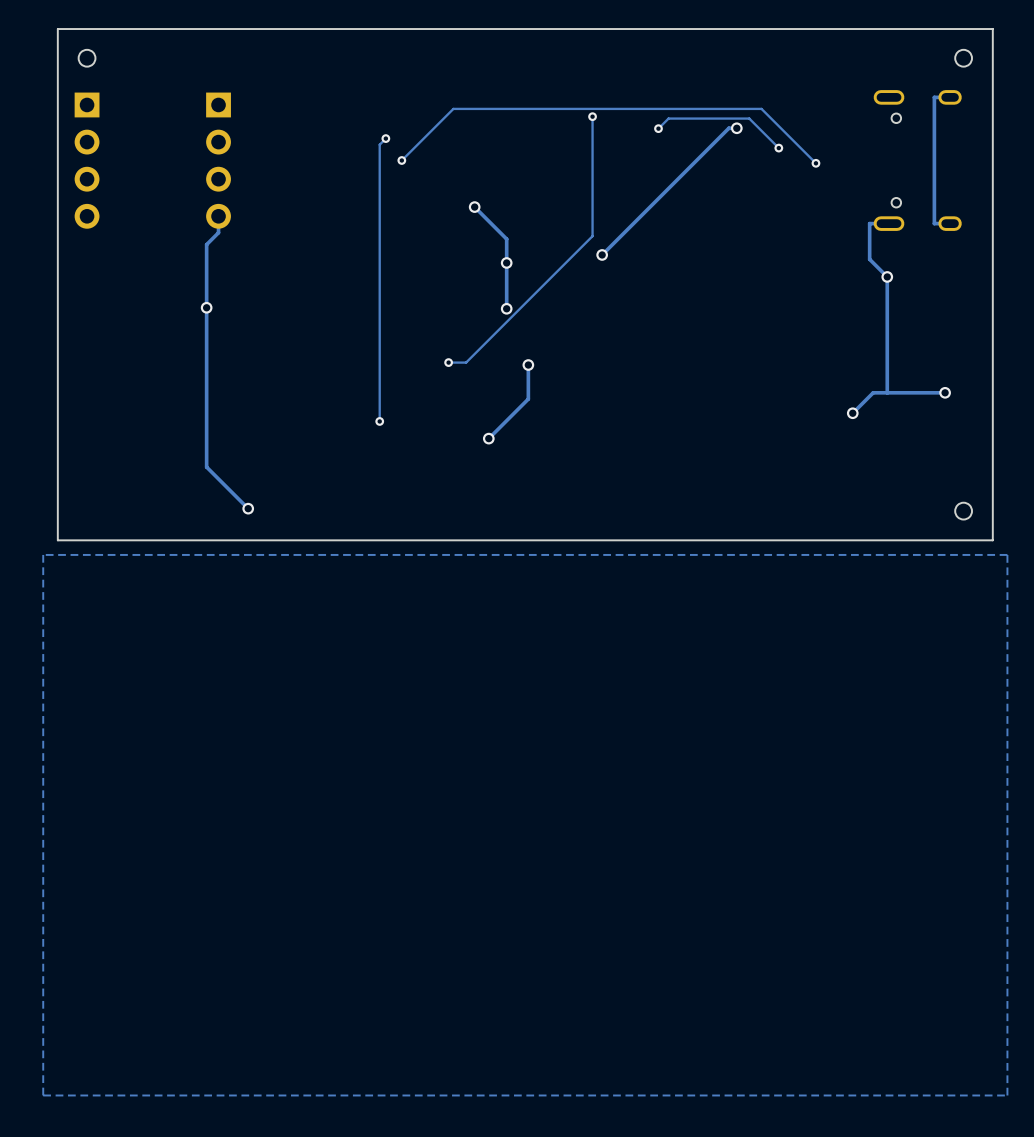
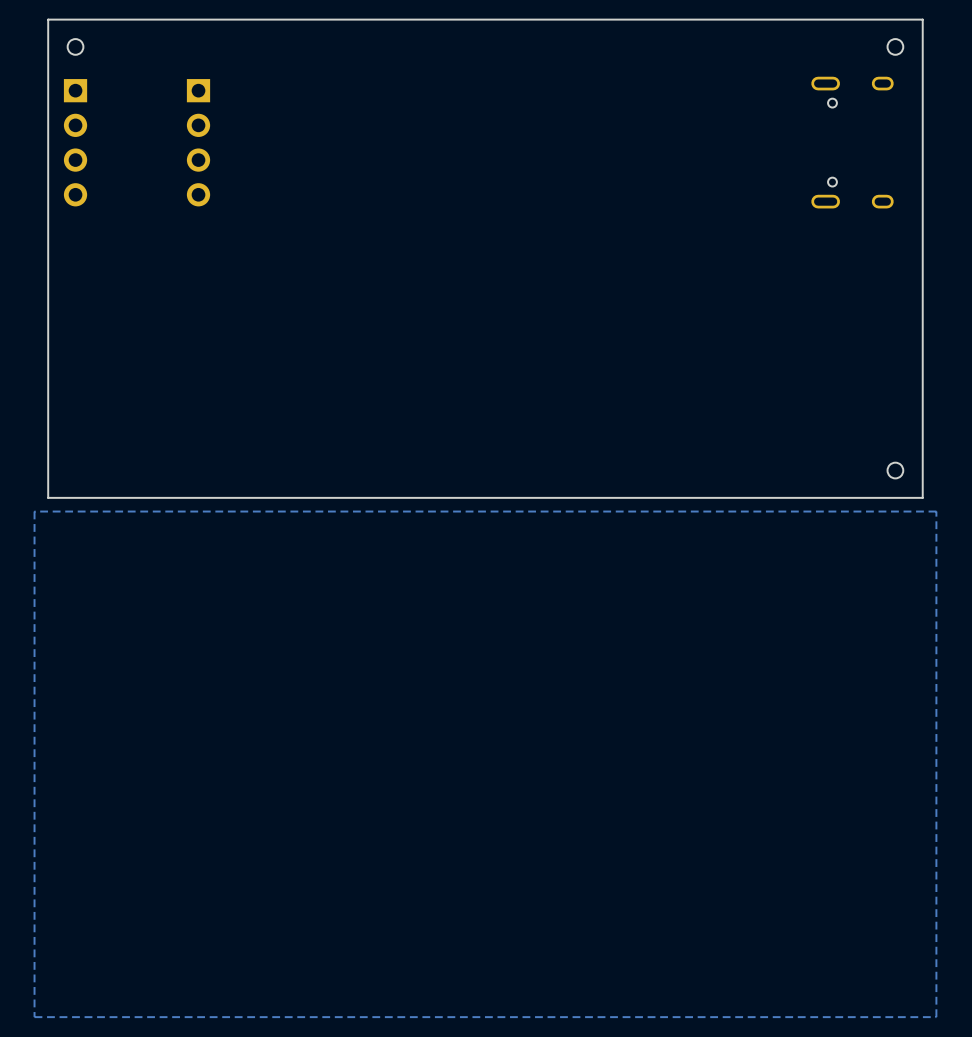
track: (950, 97) (934, 97) (934, 223) (950, 223) -> none
track: (592, 116) (592, 236) (466, 362) (448, 362) -> none
via: (592, 116) -> none
track: (658, 128) (668, 118) (749, 118) (778, 148) -> none
via: (658, 128) -> none
track: (736, 128) (728, 128) (602, 254) -> none
via: (736, 128) -> none
track: (385, 138) (379, 144) (379, 421) -> none
via: (385, 138) -> none
via: (778, 148) -> none
track: (401, 160) (453, 108) (761, 108) (815, 163) -> none
via: (401, 160) -> none
via: (815, 163) -> none
track: (474, 207) (506, 239) (506, 308) -> none
via: (474, 207) -> none
track: (218, 216) (218, 232) (206, 244) (206, 467) (248, 508) -> none
track: (889, 223) (869, 223) (869, 259) (887, 276) (887, 392) -> none
via: (602, 254) -> none
via: (506, 262) -> none
via: (887, 276) -> none
via: (206, 307) -> none
via: (506, 308) -> none
via: (448, 362) -> none
track: (528, 365) (528, 399) (488, 438) -> none
via: (528, 365) -> none
track: (945, 392) (873, 392) (852, 413) -> none
via: (945, 392) -> none
via: (852, 413) -> none
via: (379, 421) -> none
via: (488, 438) -> none
via: (248, 508) -> none

